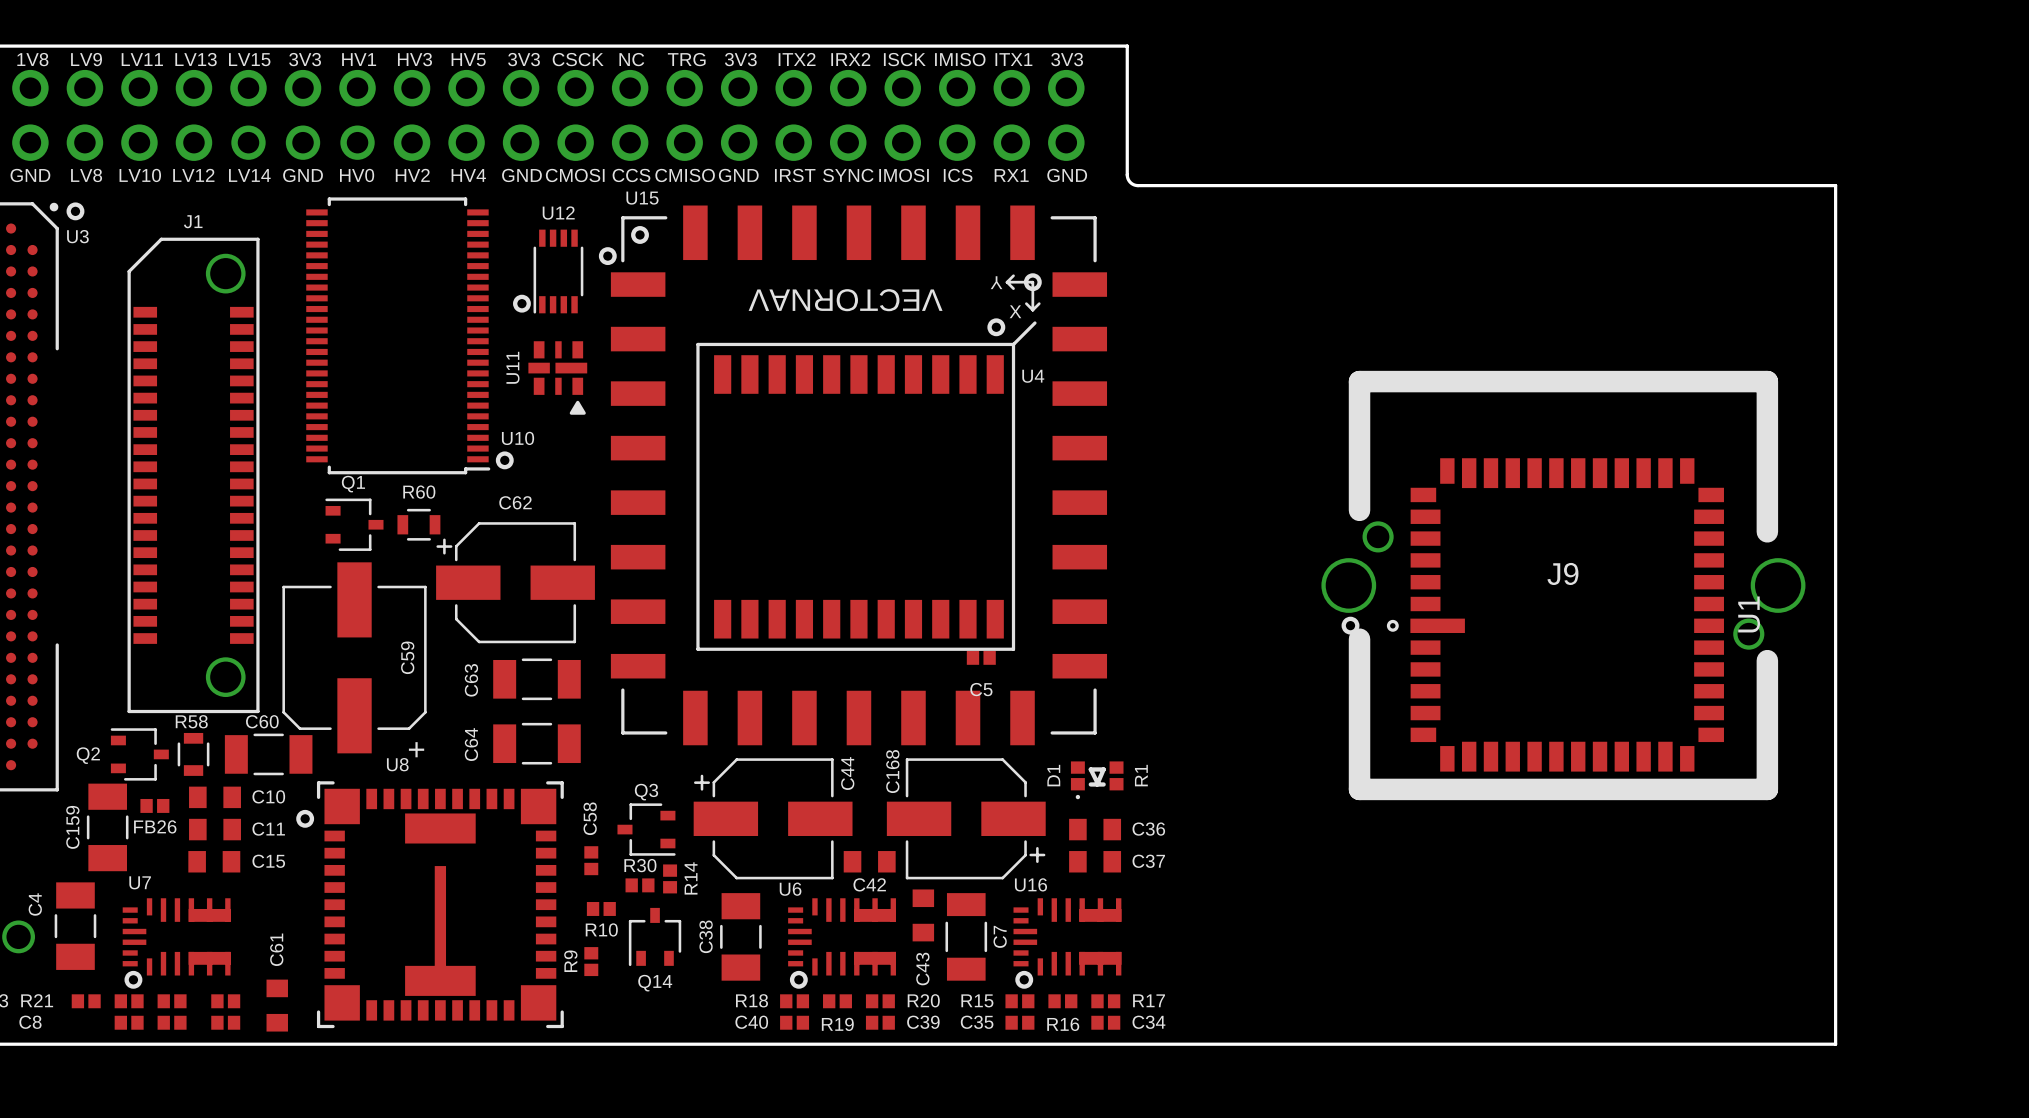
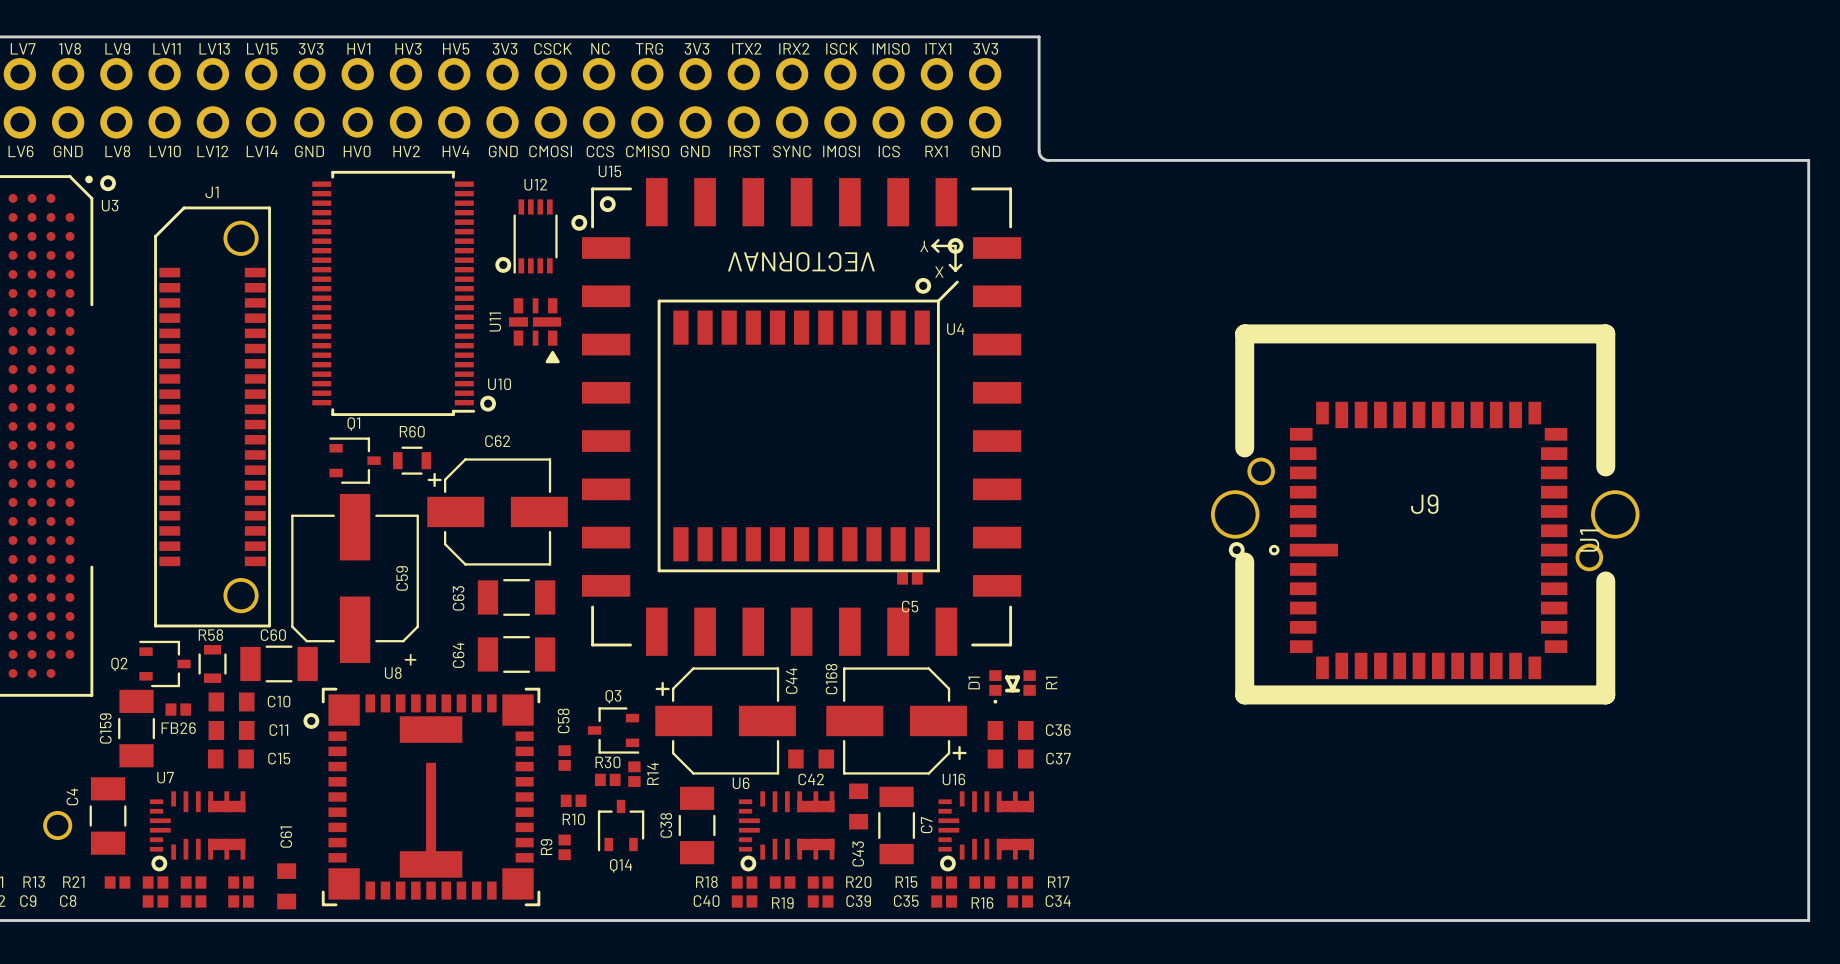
board edge: (1835, 185) (1835, 1044) -> (1666, 160) (1808, 160) (1808, 920) (1666, 920)

